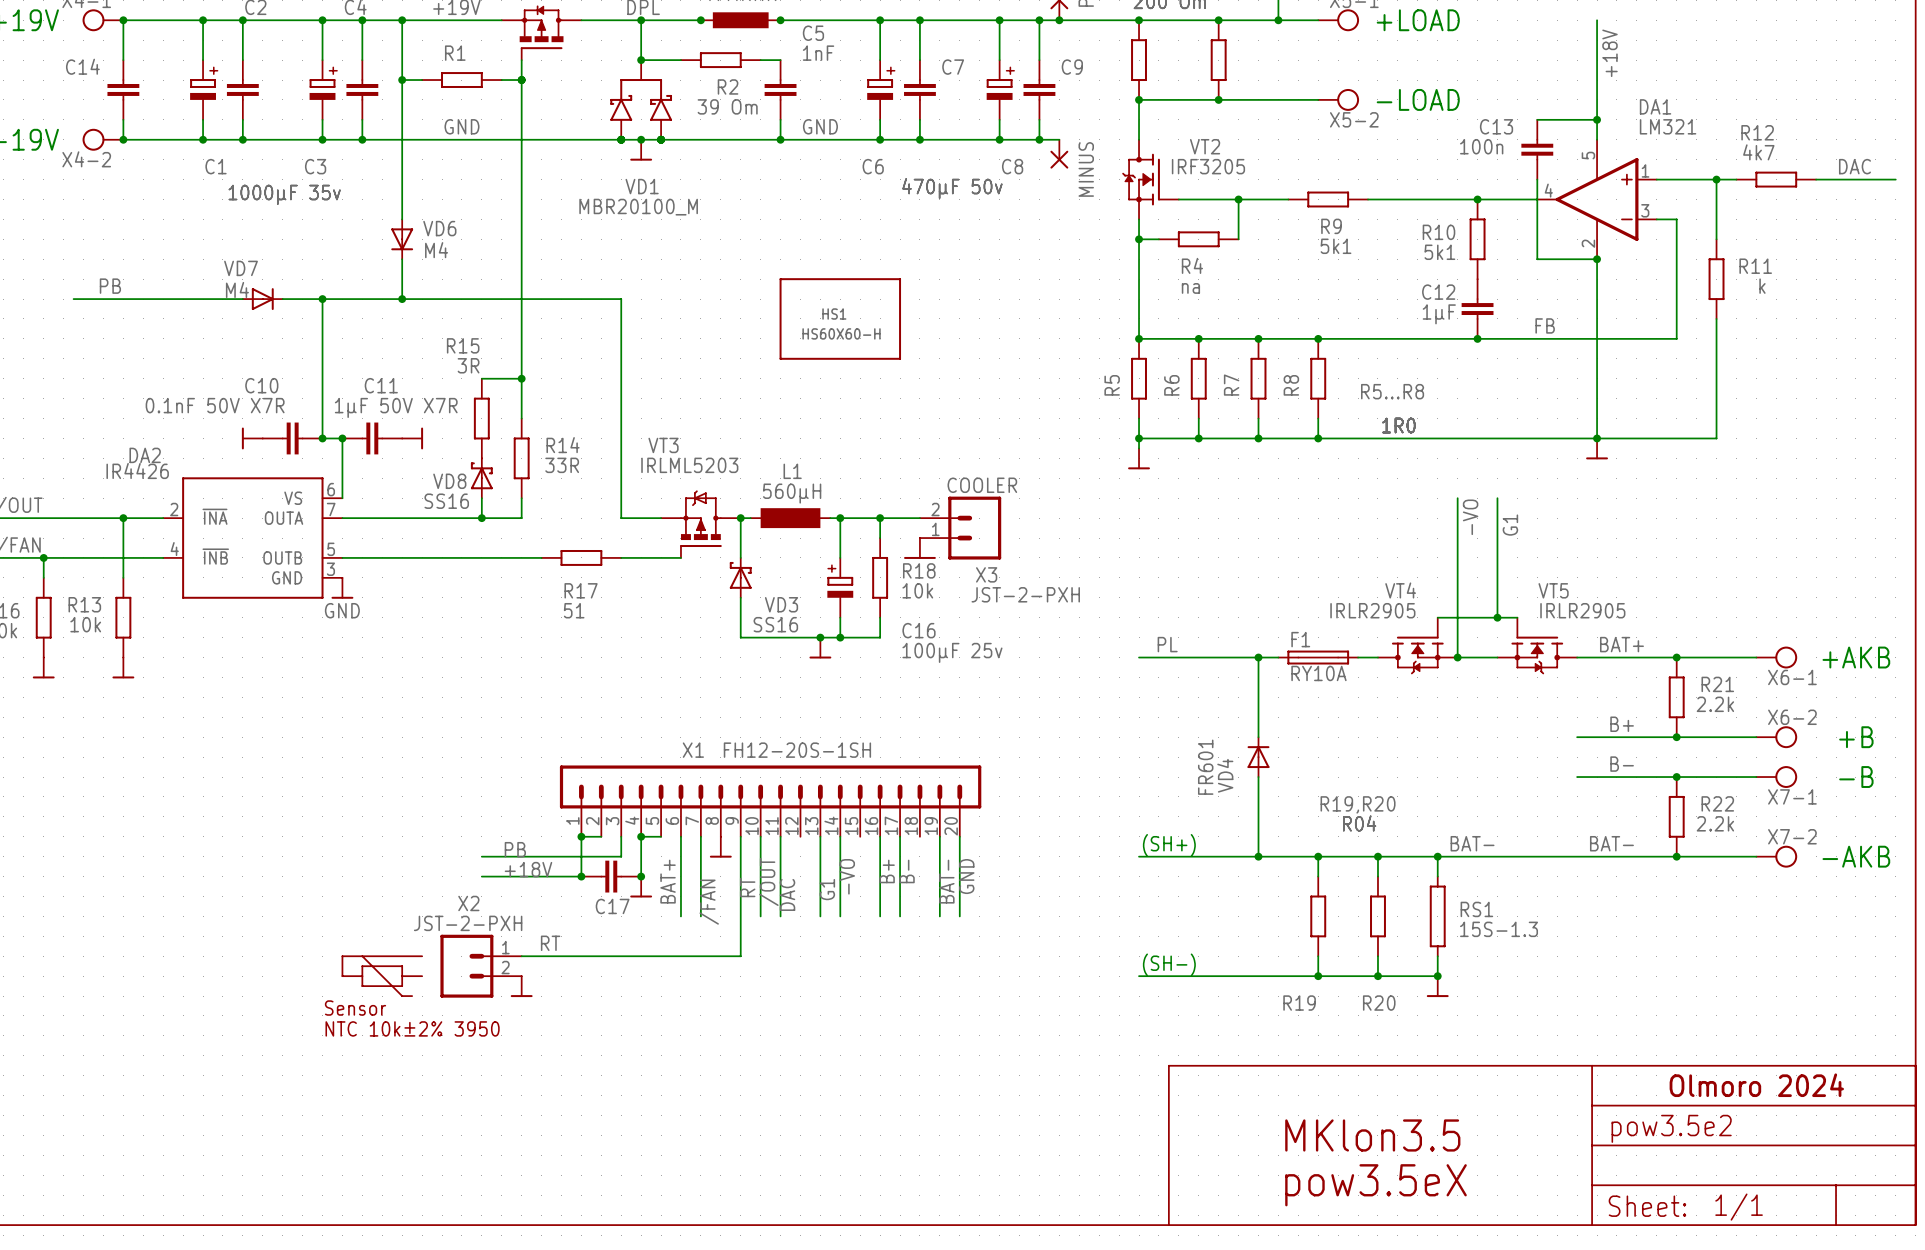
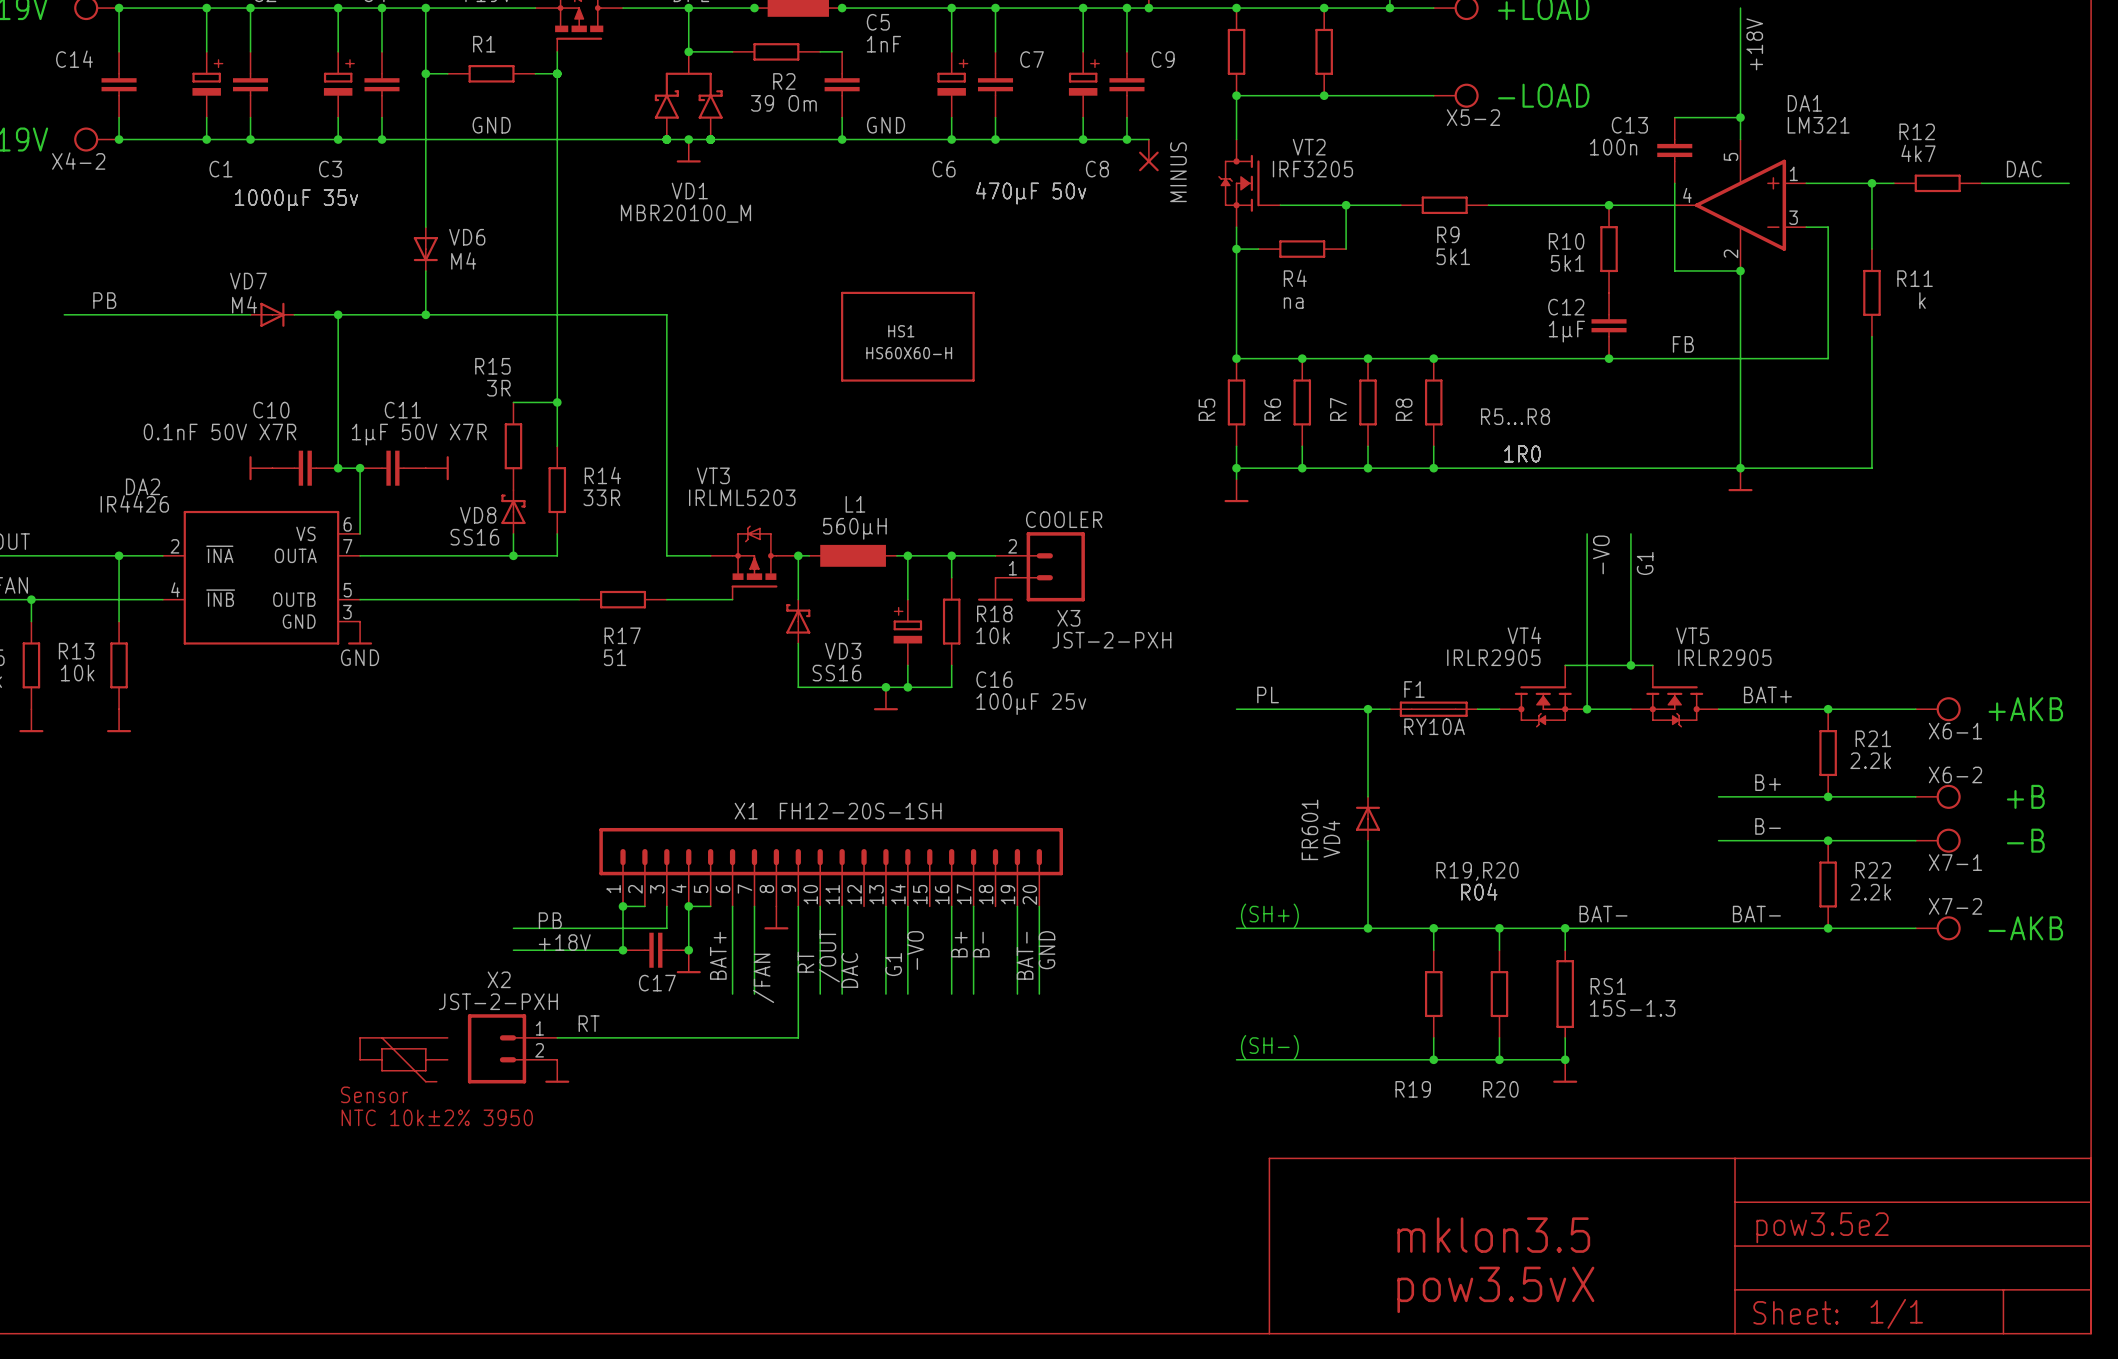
text: Olmoro 2024 (1756, 1085) -> none
text: MKlon3.5 (1372, 1135) -> mklon3.5 (1493, 1235)
text: pow3.5eX (1376, 1185) -> pow3.5vX (1495, 1289)

